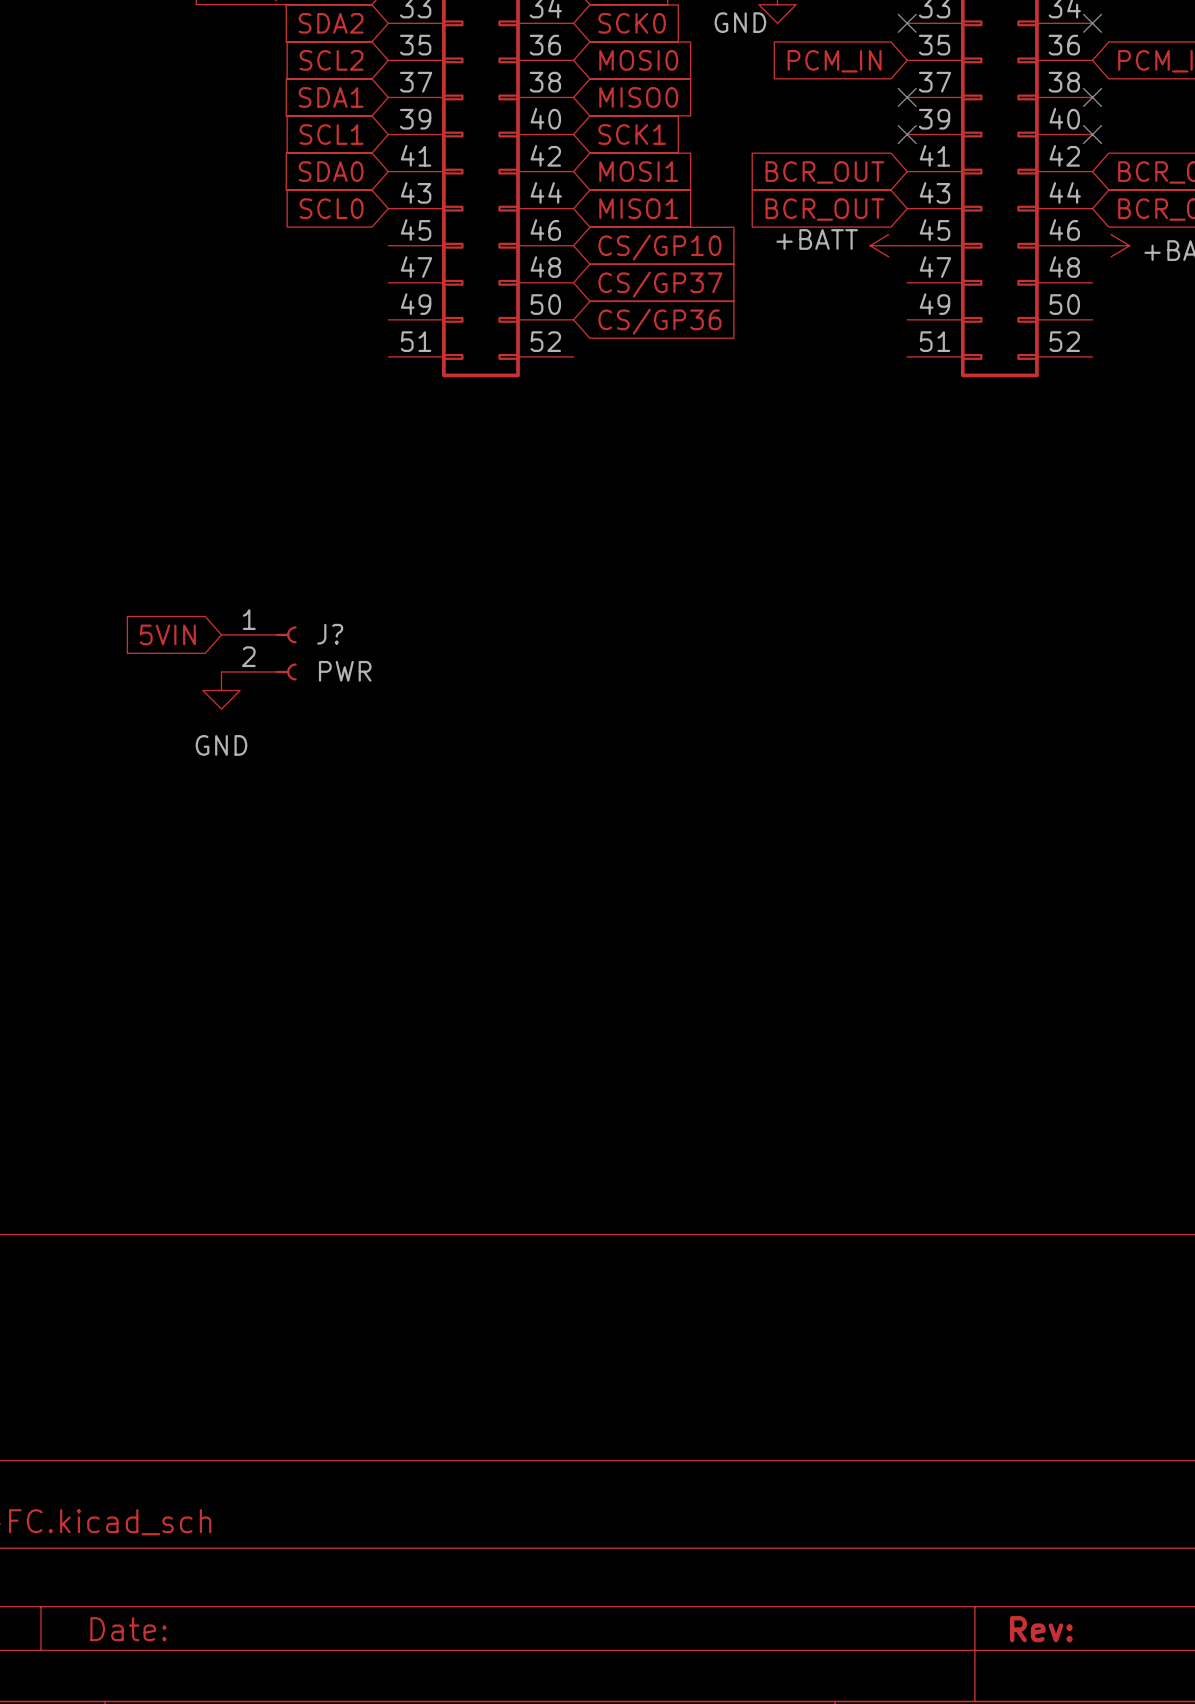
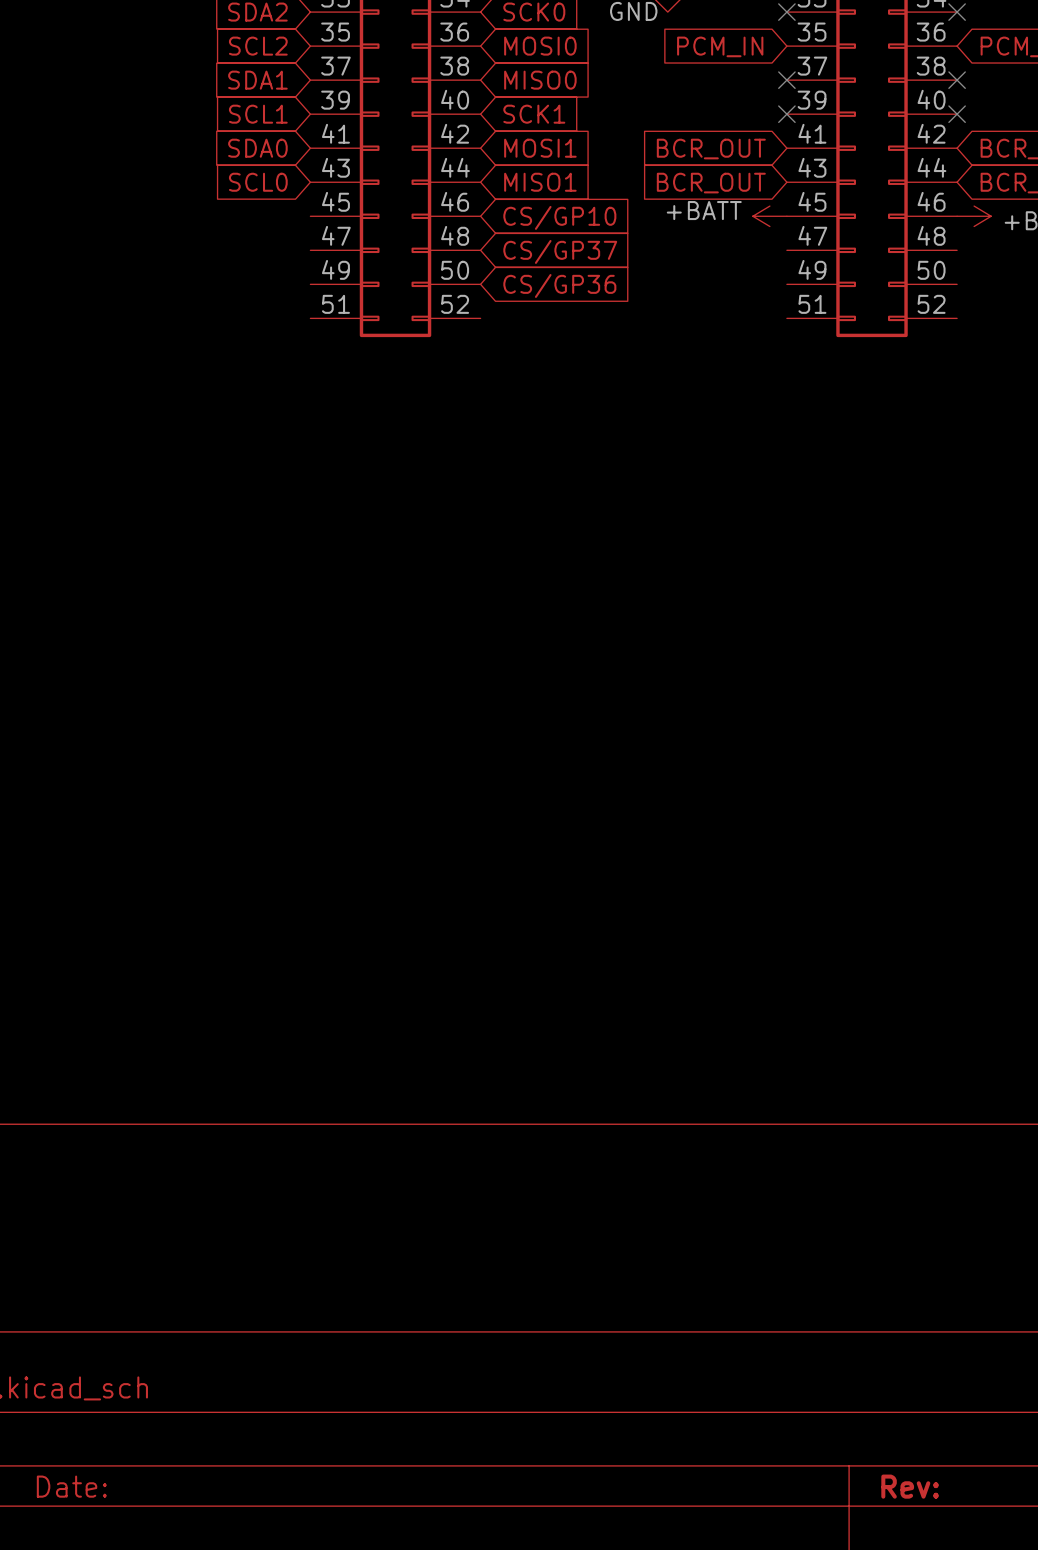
global label: 5VIN (167, 634) -> none
J?: PWR (259, 653) -> none
power symbol: GND (221, 690) -> none

